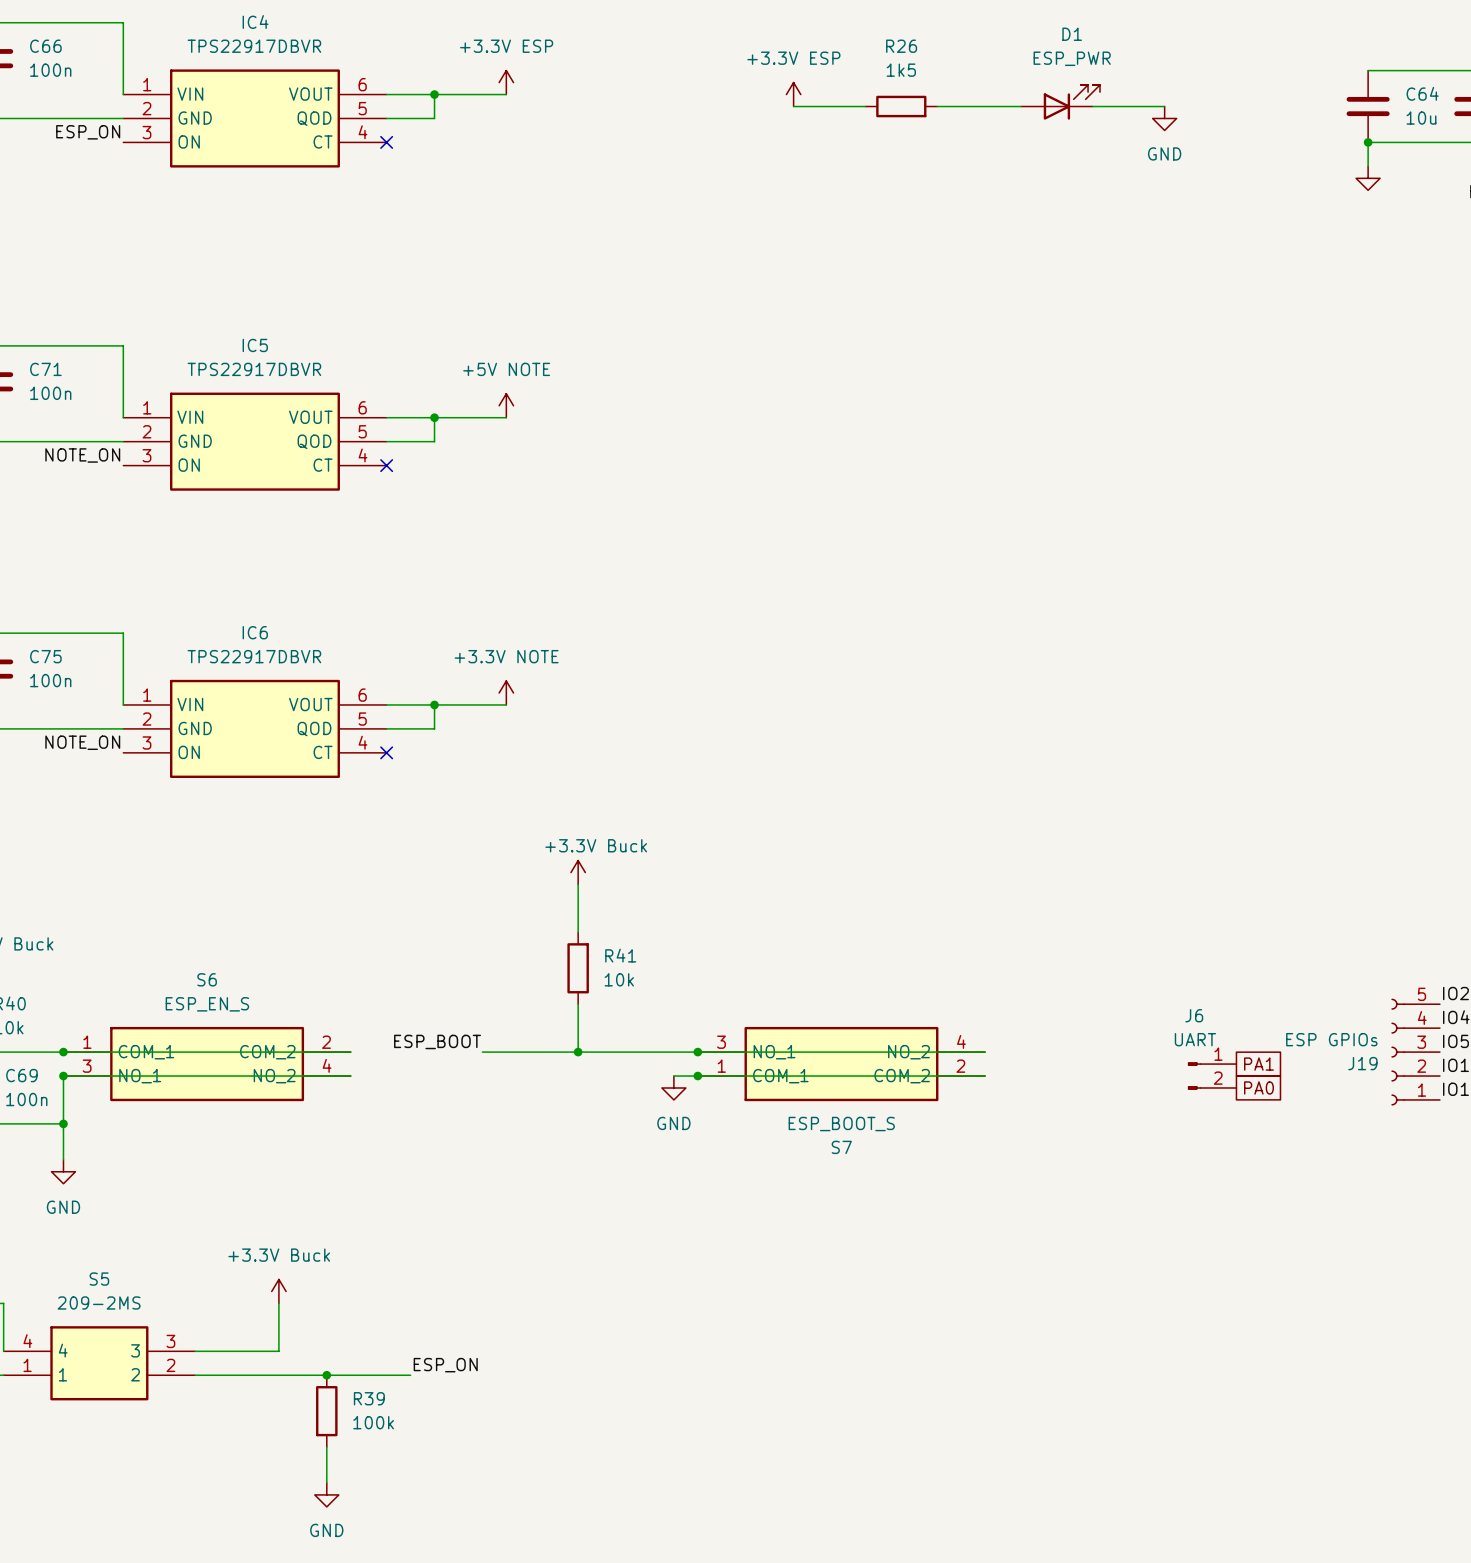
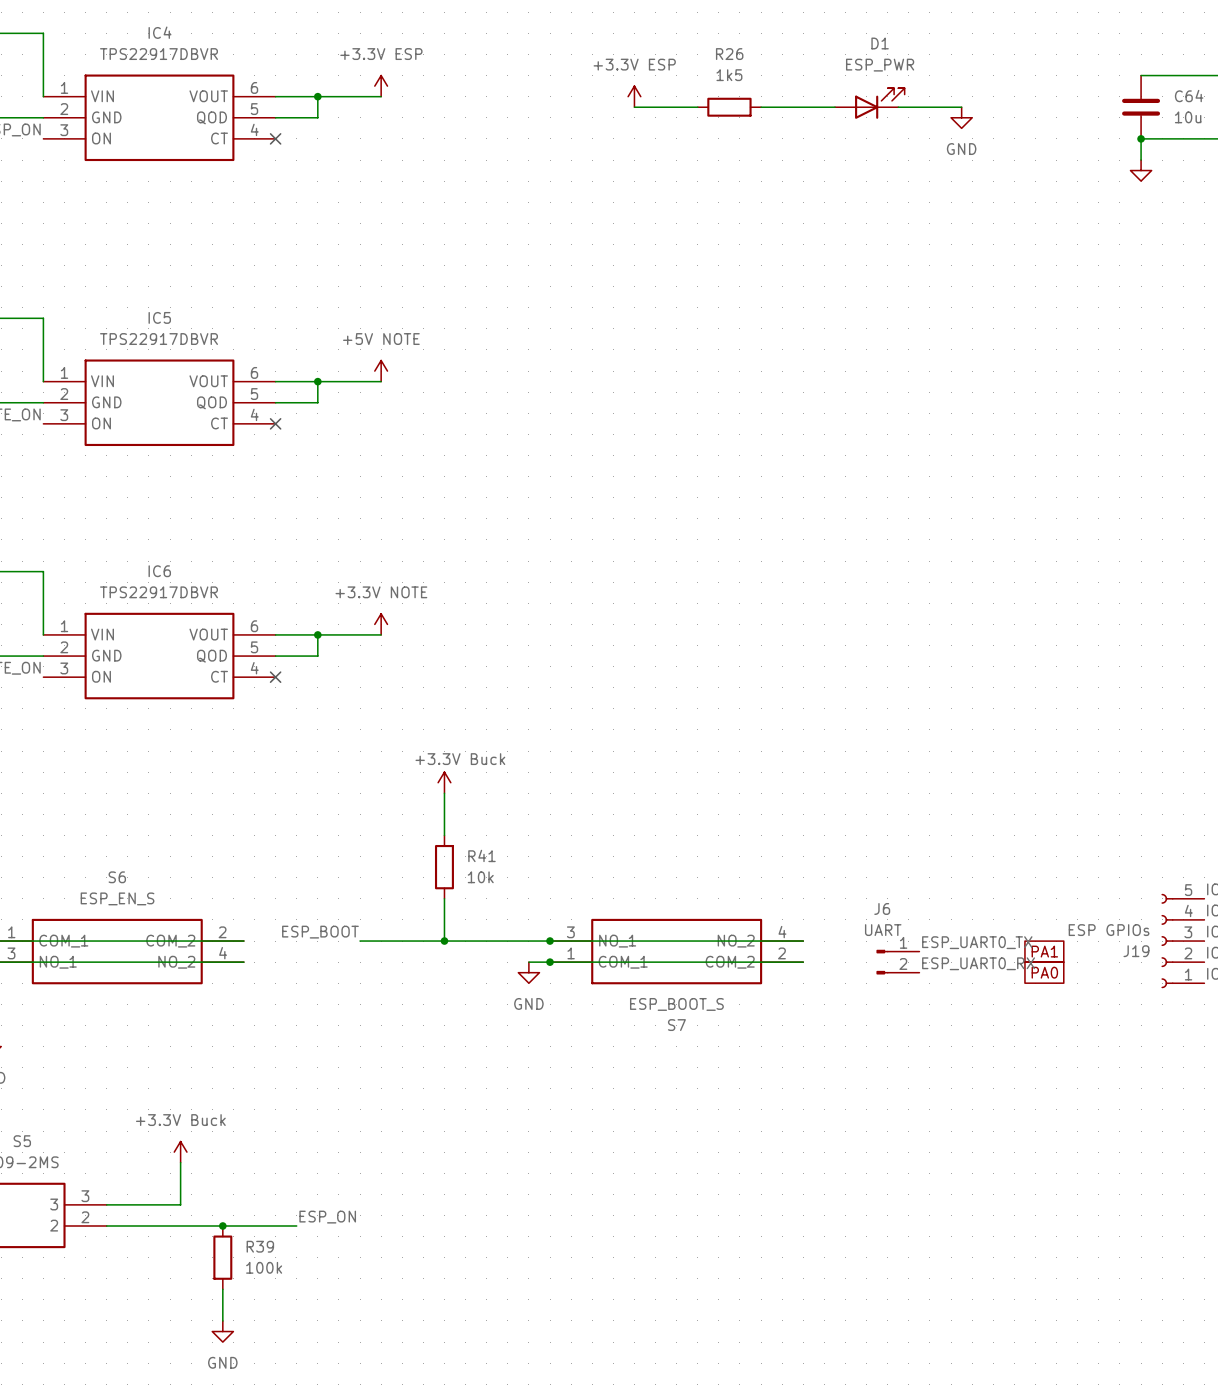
label: none -> ESP_UART0_TX (977, 942)
J6 position: (1212, 1076) -> (897, 962)
label: none -> ESP_UART0_RX (978, 963)

